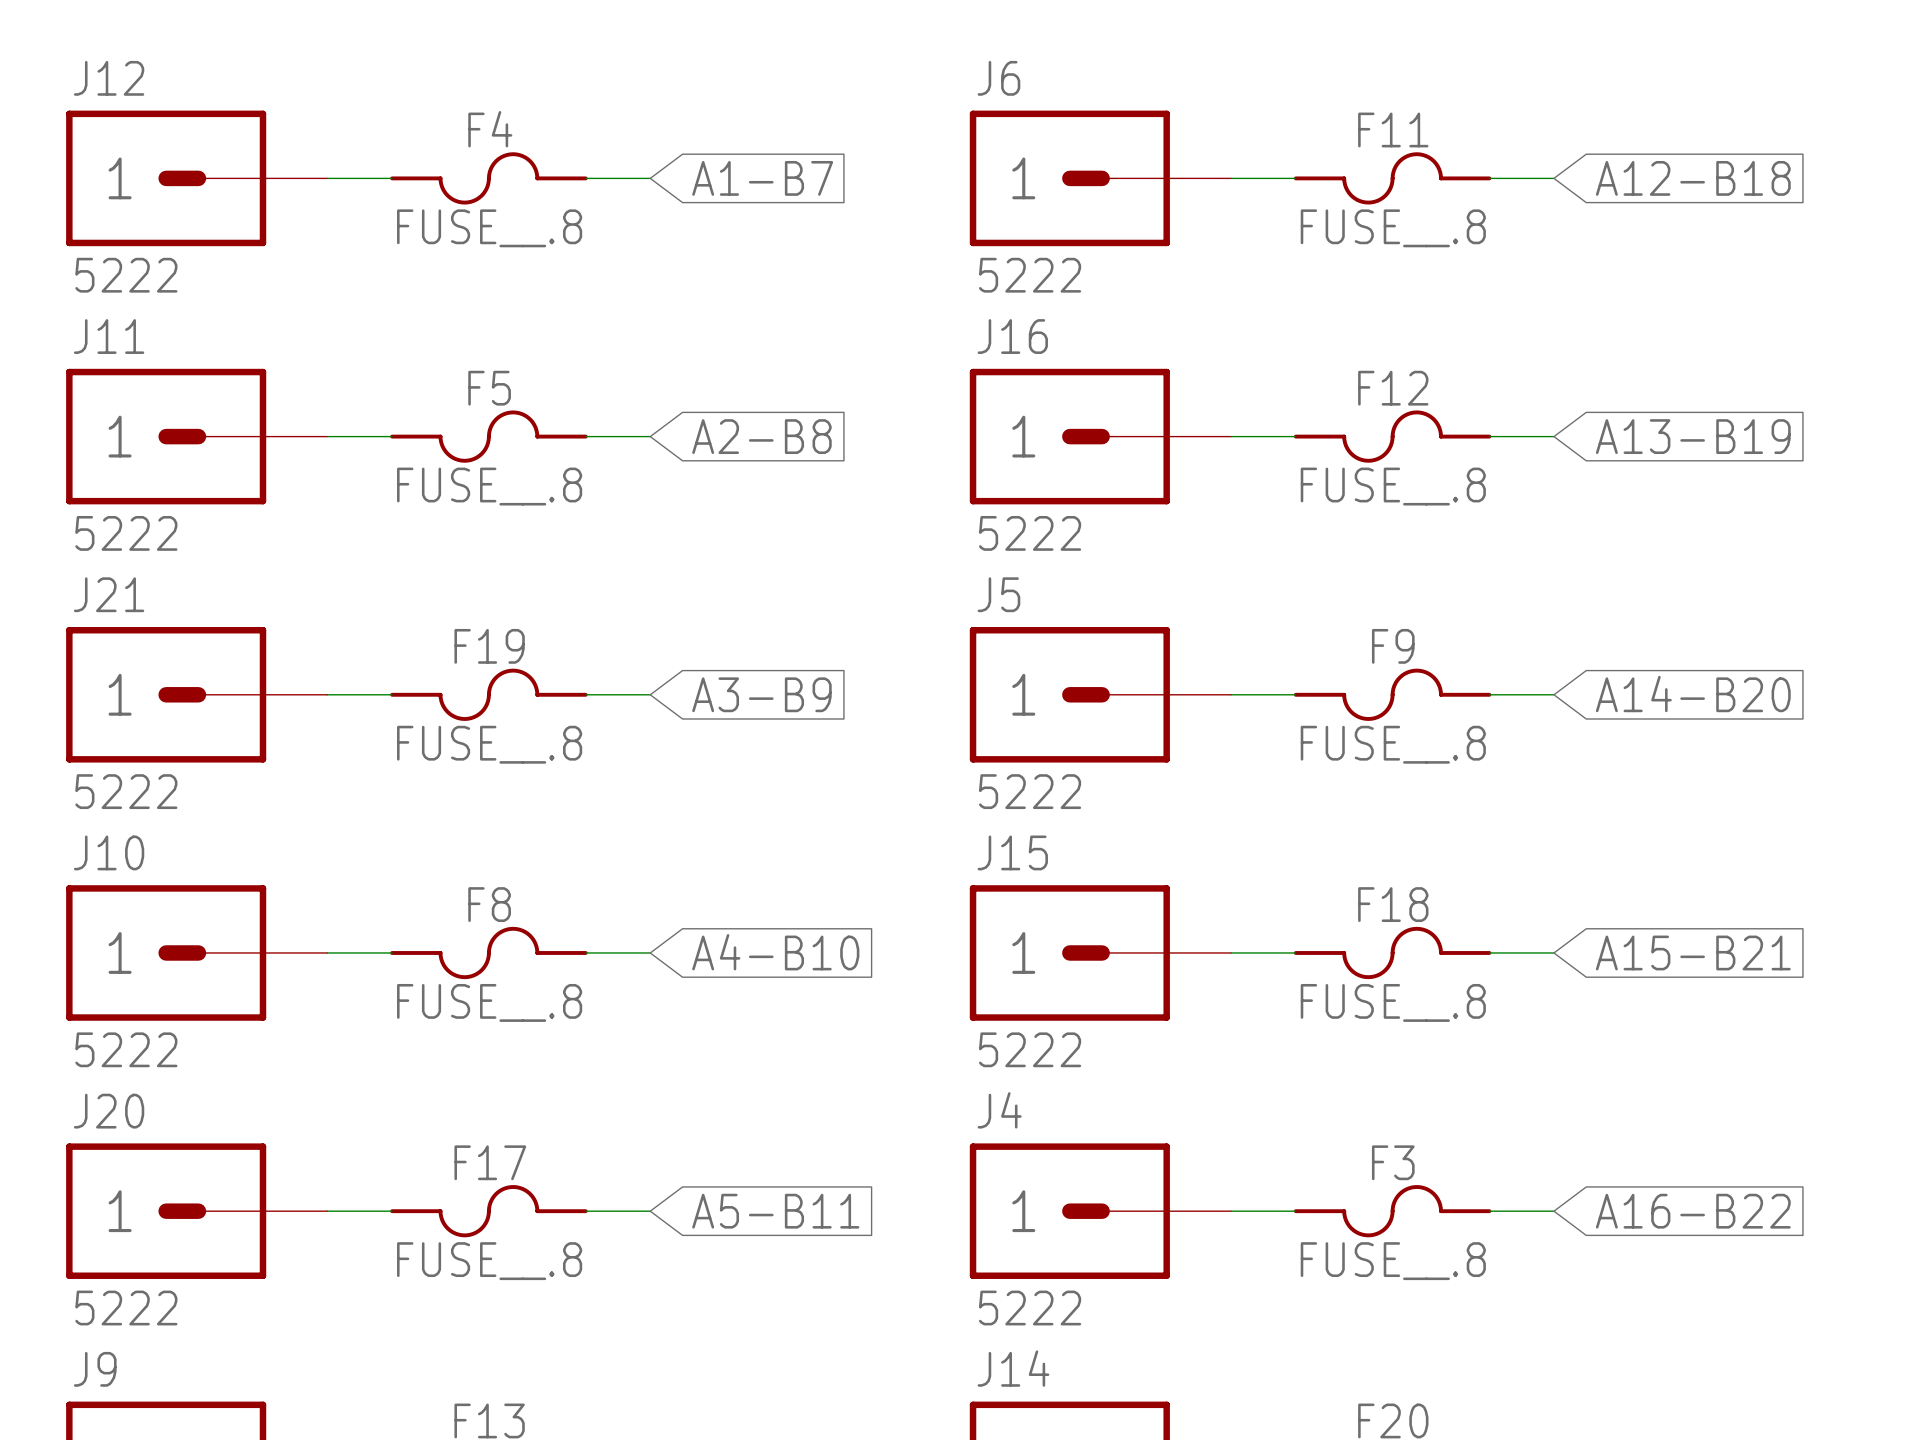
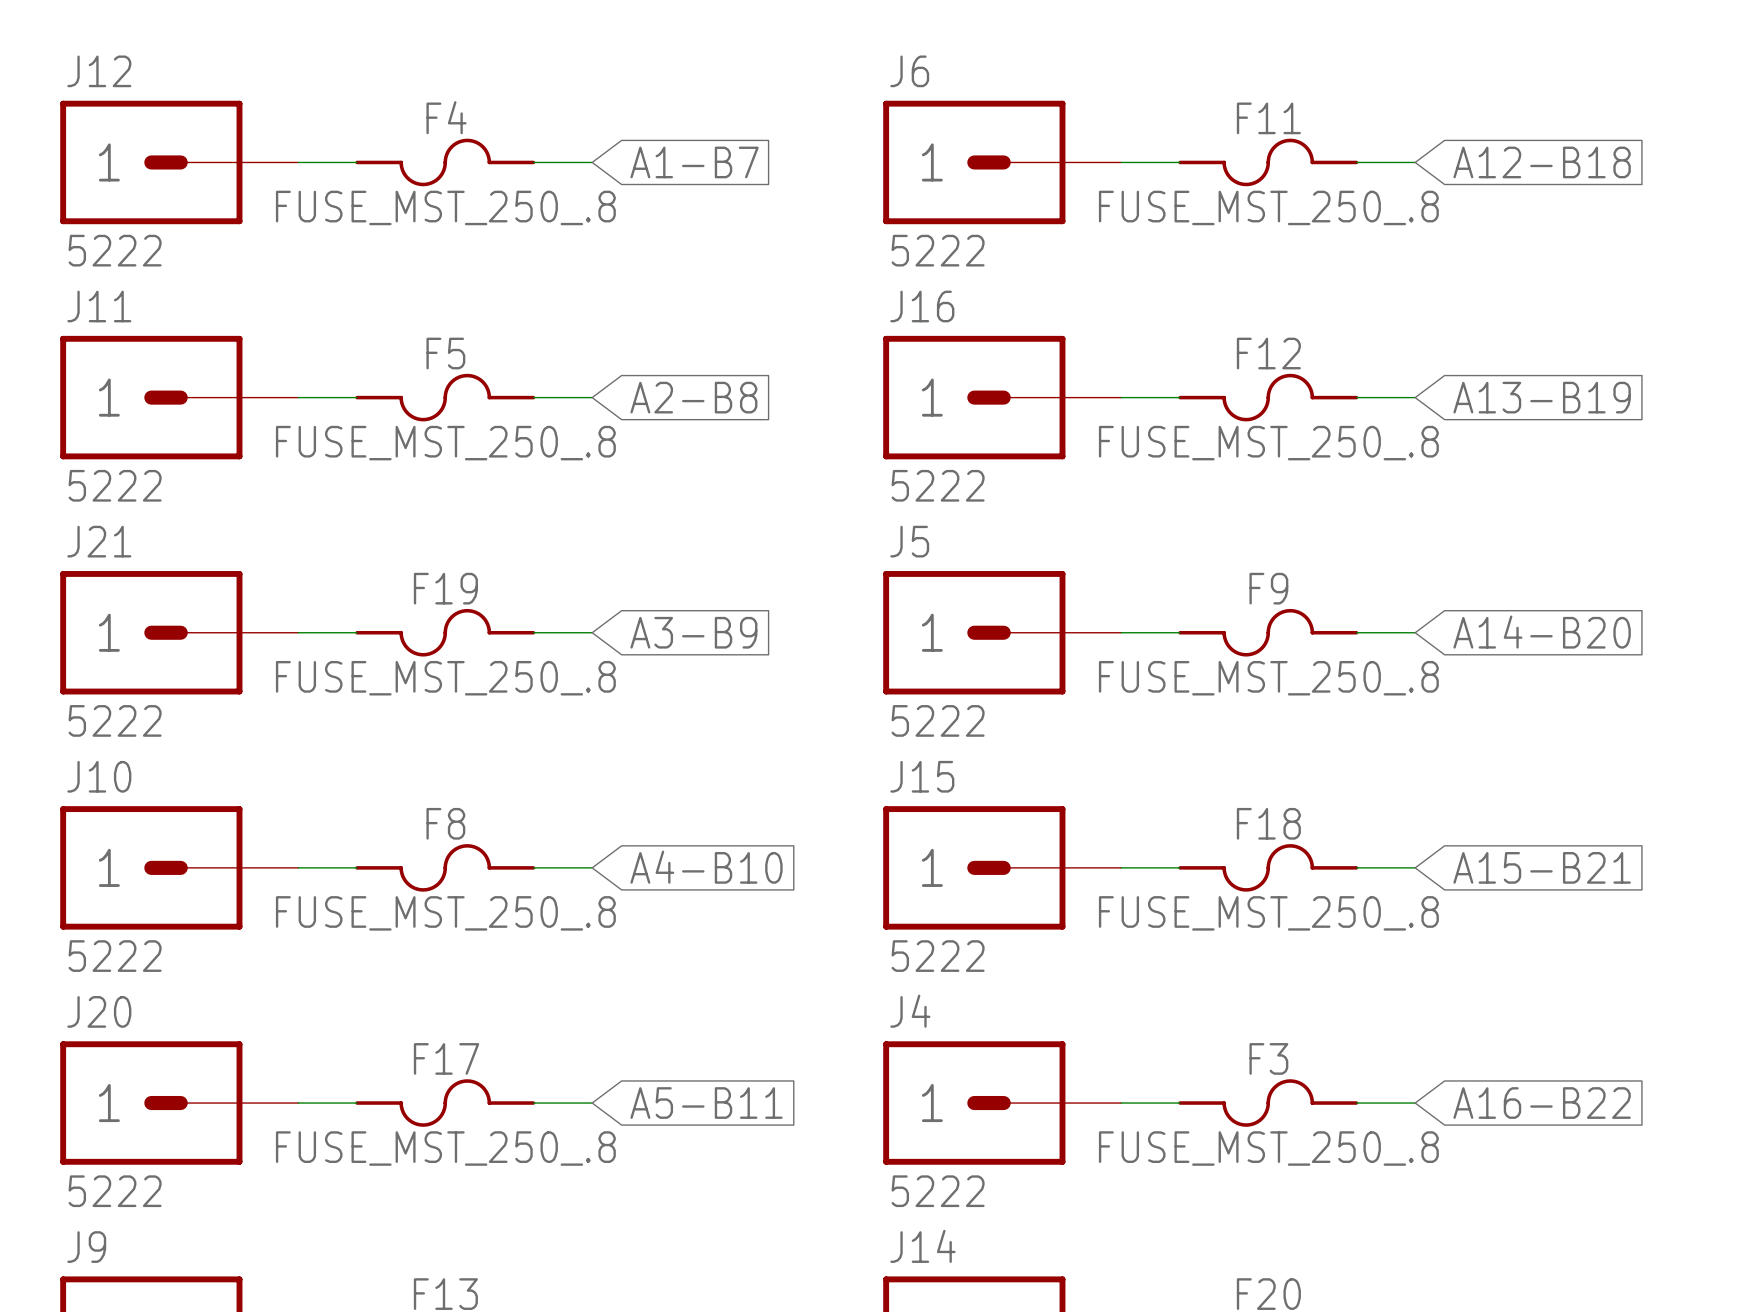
F4 value: FUSE__.8 (489, 228) -> FUSE_MST_250_.8 (445, 207)
F11 value: FUSE__.8 (1393, 228) -> FUSE_MST_250_.8 (1268, 207)
F5 value: FUSE__.8 (489, 486) -> FUSE_MST_250_.8 (445, 443)
F12 value: FUSE__.8 (1393, 486) -> FUSE_MST_250_.8 (1268, 443)
F19 value: FUSE__.8 (489, 744) -> FUSE_MST_250_.8 (445, 678)
F9 value: FUSE__.8 (1393, 744) -> FUSE_MST_250_.8 (1268, 678)
F8 value: FUSE__.8 (489, 1002) -> FUSE_MST_250_.8 (445, 913)
F18 value: FUSE__.8 (1393, 1002) -> FUSE_MST_250_.8 (1268, 913)
F17 value: FUSE__.8 (489, 1261) -> FUSE_MST_250_.8 (445, 1148)
F3 value: FUSE__.8 (1393, 1261) -> FUSE_MST_250_.8 (1268, 1148)

